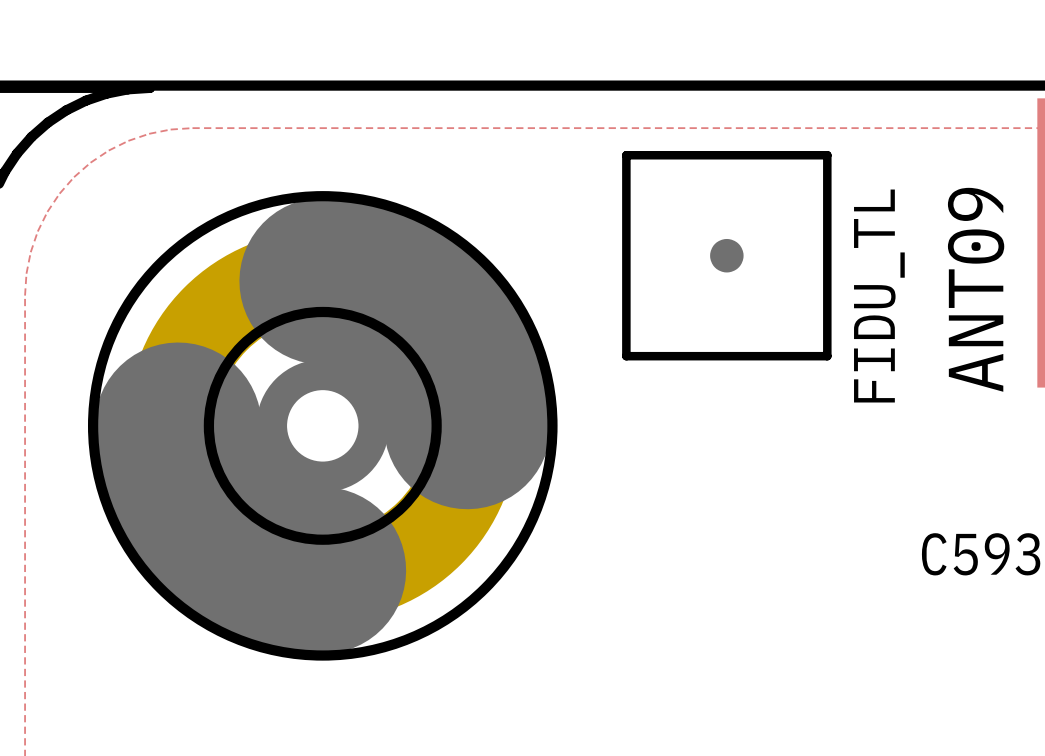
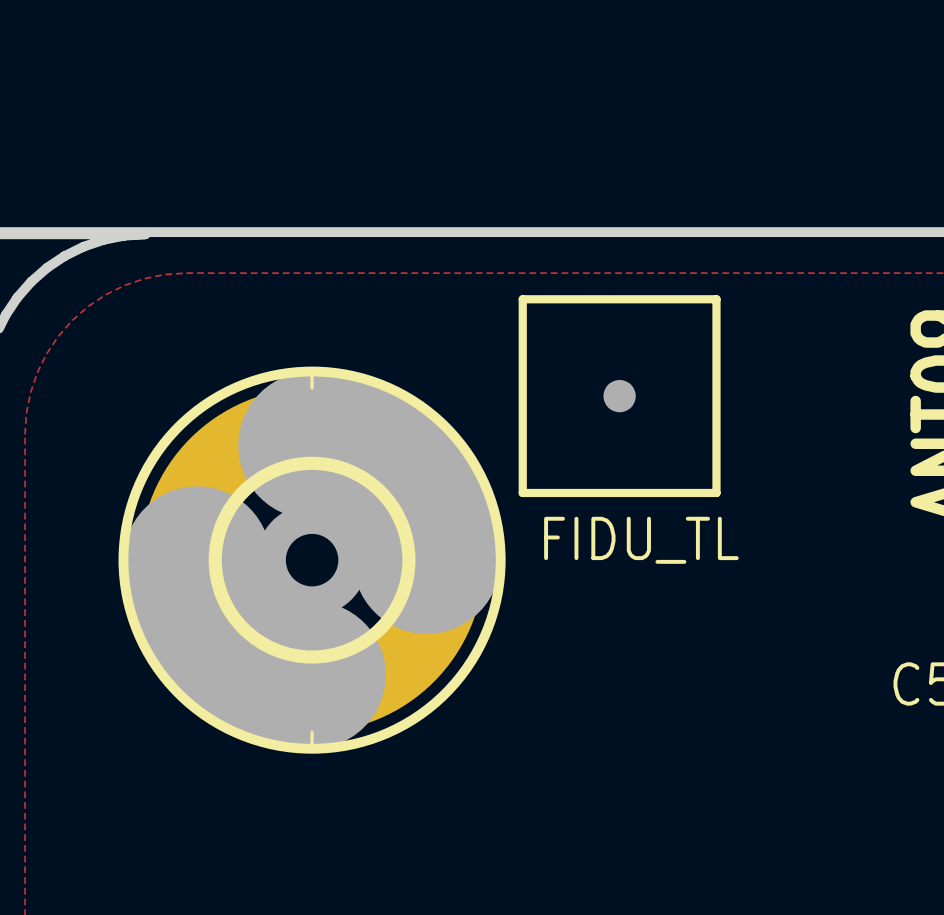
part footprint: [87, 191, 558, 661] -> [118, 366, 506, 754]
FIDU_TL position: (726, 255) -> (619, 396)
FIDU_TL name rotation: 0° (879, 296) -> 90° clockwise (641, 540)

